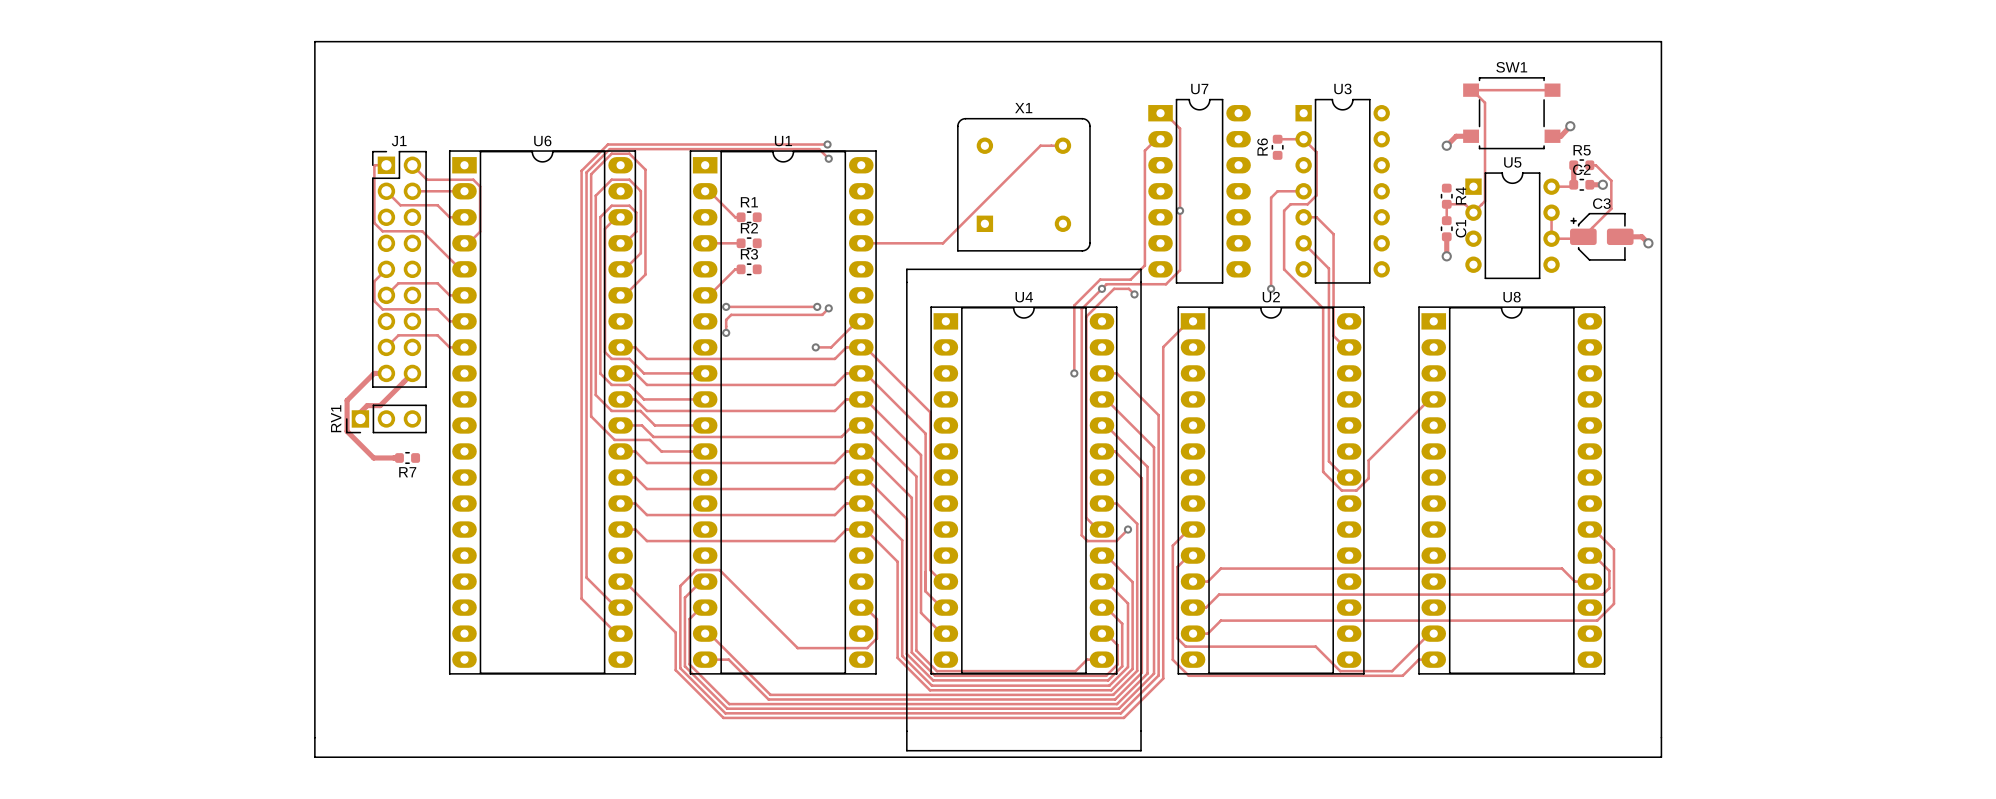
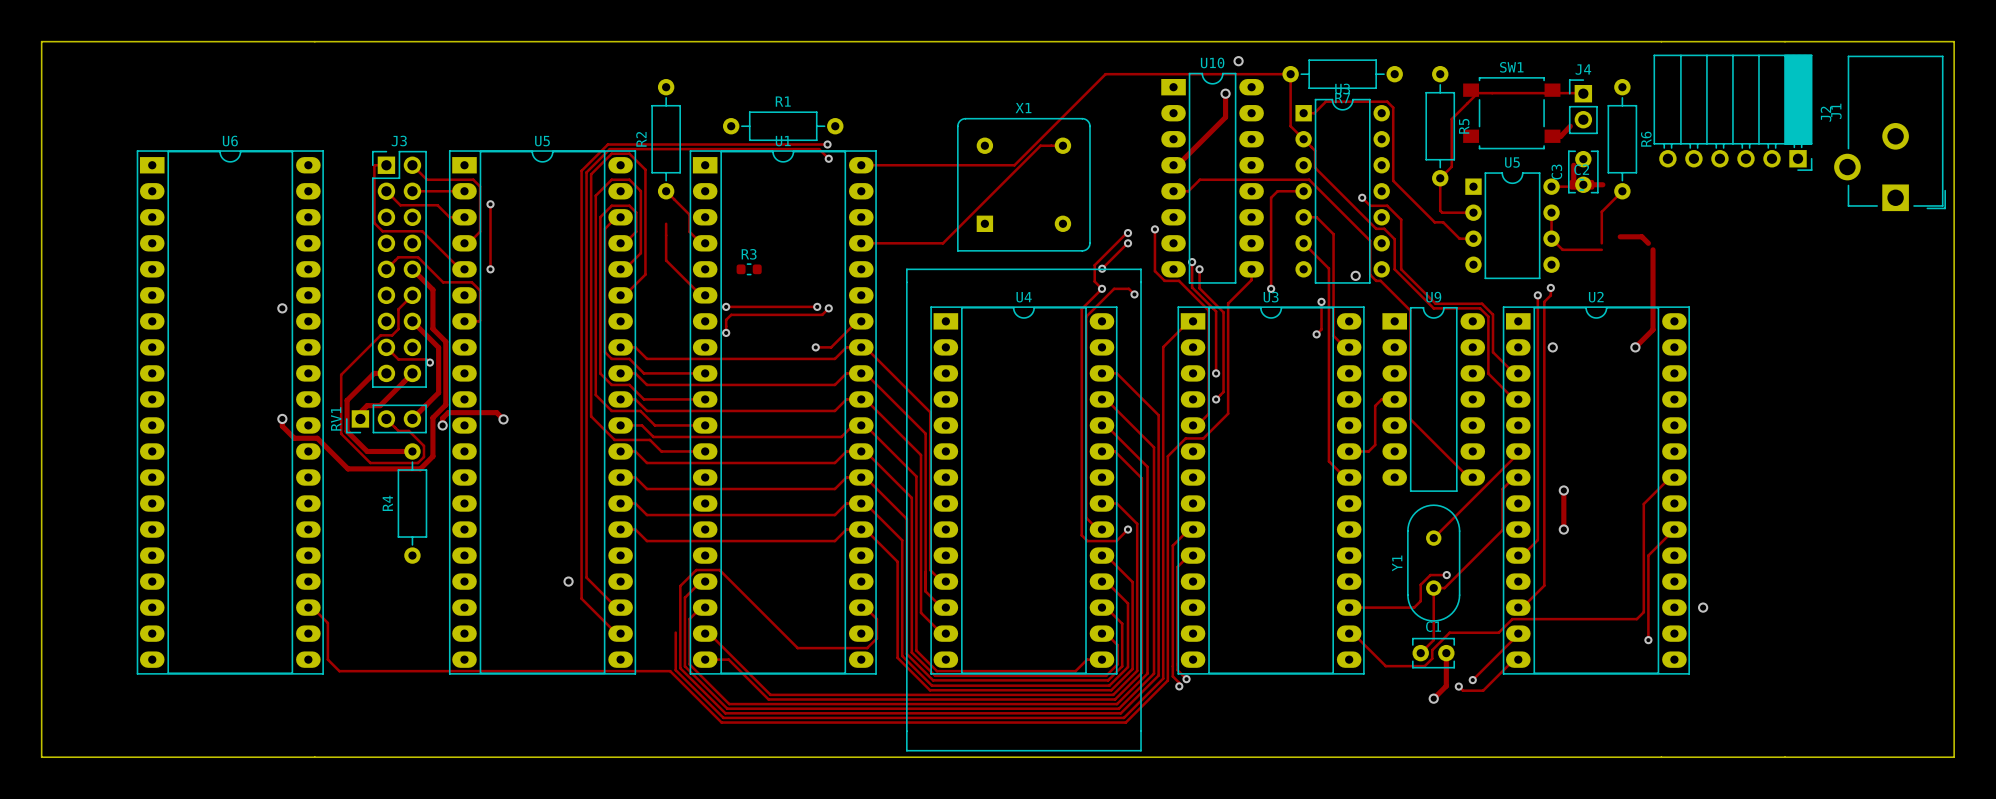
board edge: (314, 41) (314, 757) -> (314, 41) (41, 41) (41, 757) (314, 757)
board edge: (1661, 41) (1661, 757) -> (1661, 41) (1954, 41) (1954, 757) (1661, 757)
via: none -> (1238, 61)
track: (1471, 90) (1552, 90) -> none
track: (1472, 90) (1485, 102) (1485, 201) (1473, 212) (1465, 204) (1446, 204) (1446, 220) -> none
track: none -> (1225, 93) (1225, 117) (1177, 165) (1173, 165)
via: none -> (1225, 93)
track: none -> (1583, 93) (1477, 93) (1451, 119) (1451, 166) (1440, 178) (1440, 210) (1442, 212) (1473, 212)
J4: none -> (1583, 106)
J2: none -> (1732, 112)
track: (1160, 113) (1164, 113) (1180, 128) (1180, 270) (1166, 284) (1106, 284) (1101, 288) -> (1127, 233) (1094, 265) (1094, 281) (1101, 288)
track: none -> (1303, 113) (1314, 113) (1325, 101) (1387, 101) (1393, 107) (1393, 180) (1434, 222) (1443, 222) (1459, 238) (1473, 238)
via: (1570, 126) -> none
J1: none -> (1889, 133)
R6 footprint: [1271, 134, 1284, 160] -> [1607, 79, 1638, 200]
track: (1471, 136) (1456, 136) (1446, 145) -> none
track: (1160, 139) (1156, 139) (1144, 150) (1144, 265) (1130, 279) (1100, 279) (1074, 305) (1074, 373) -> none
track: (1277, 139) (1303, 139) -> (861, 165) (1014, 165) (1105, 74) (1290, 74) (1290, 126) (1303, 139)
J1 name: J1 (399, 141) -> J3 (399, 141)
U6 name: U6 (542, 141) -> U5 (542, 141)
via: (1446, 145) -> none
R6 name position: R6 (1262, 147) -> R6 (1646, 139)
track: (1315, 150) (1316, 195) (1307, 204) (1290, 204) (1284, 210) (1284, 269) (1323, 308) (1323, 471) (1341, 490) (1356, 490) (1368, 478) (1368, 460) (1429, 399) (1433, 399) -> (1315, 150) (1315, 167) (1376, 228) (1384, 228) (1394, 239) (1394, 269) (1433, 308) (1480, 308) (1488, 316) (1488, 373) (1514, 399) (1518, 399)
R5 name position: R5 (1582, 150) -> R5 (1464, 126)
R5 footprint: [1569, 159, 1595, 172] -> [1425, 65, 1455, 187]
track: (1589, 165) (1595, 165) (1611, 180) (1611, 208) (1581, 238) (1551, 238) -> (1601, 249) (1562, 249) (1551, 238)
U10: none -> (1212, 178)
R4 footprint: [1440, 183, 1453, 209] -> [397, 443, 428, 564]
via: (1602, 184) -> none
track: (705, 191) (709, 191) (735, 217) (741, 217) -> none
track: none -> (1173, 191) (1188, 191) (1199, 179) (1309, 179) (1370, 240) (1370, 274) (1376, 280) (1380, 280) (1410, 310) (1410, 419) (1468, 477) (1472, 477)
U7: (1199, 191) -> none
track: none -> (1622, 191) (1601, 211) (1601, 243)
R4 name position: R4 (1461, 195) -> R4 (387, 503)
track: none -> (1362, 197) (1370, 205) (1387, 205) (1401, 219) (1401, 269) (1435, 303) (1482, 303) (1493, 314) (1493, 352) (1514, 373) (1518, 373)
via: none -> (1362, 197)
C3 name position: C3 (1601, 203) -> C3 (1556, 172)
track: none -> (490, 204) (490, 269)
via: none -> (490, 204)
via: (1180, 210) -> none
R1 footprint: [736, 211, 762, 224] -> [723, 111, 844, 141]
C3 footprint: [1570, 213, 1634, 261] -> [1568, 150, 1599, 194]
C1 footprint: [1440, 216, 1453, 242] -> [1412, 637, 1455, 669]
R2 name position: R2 (749, 228) -> R2 (641, 139)
C1 name position: C1 (1461, 228) -> C1 (1433, 626)
track: none -> (1154, 229) (1154, 271) (1164, 280) (1179, 280) (1208, 310) (1208, 413) (1197, 425) (1193, 425)
via: none -> (1154, 229)
via: none -> (1127, 233)
track: (1446, 236) (1446, 256) -> none
R2 footprint: [736, 237, 762, 250] -> [651, 79, 681, 200]
track: (705, 243) (741, 243) -> (705, 243) (701, 243) (689, 231) (689, 214) (666, 191)
track: none -> (1128, 243) (1102, 268)
via: none -> (1128, 243)
via: (1648, 243) -> none
track: none -> (1653, 249) (1653, 329) (1635, 347)
via: (1446, 256) -> none
track: none -> (1192, 262) (1192, 287) (1216, 311) (1216, 373)
via: none -> (1192, 262)
via: none -> (1102, 268)
track: (386, 269) (374, 281) (374, 301) (382, 309) (437, 309) (449, 321) (464, 321) -> (386, 269) (398, 257) (418, 257) (443, 282) (471, 282) (480, 290) (480, 320) (464, 321)
track: none -> (412, 269) (432, 289) (432, 328) (445, 341) (445, 404) (432, 417) (432, 456) (420, 468) (347, 468) (317, 438) (294, 438) (282, 426) (282, 418)
via: none -> (490, 269)
track: (741, 269) (735, 269) (709, 295) (705, 295) -> (666, 223) (666, 260) (701, 295) (705, 295)
track: none -> (1199, 269) (1199, 288) (1223, 312) (1223, 392) (1216, 399)
via: none -> (1199, 269)
track: none -> (1251, 269) (1251, 280) (1228, 303) (1228, 413) (1203, 438) (1185, 438) (1167, 456) (1167, 680) (1125, 722) (721, 722) (670, 671) (339, 671) (327, 659) (327, 623) (312, 607) (308, 607)
via: none -> (1355, 275)
track: none -> (1550, 287) (1550, 295) (1544, 301) (1544, 585) (1522, 607) (1518, 607)
via: none -> (1550, 287)
track: (386, 295) (398, 283) (437, 283) (449, 295) (464, 295) -> none
track: none -> (412, 295) (398, 309) (398, 329) (392, 335) (380, 335) (341, 374) (341, 433) (370, 463) (417, 463) (423, 457) (423, 445) (409, 430) (398, 430) (386, 418)
track: none -> (1537, 295) (1537, 540) (1522, 555) (1518, 555)
via: none -> (1537, 295)
U2 name: U2 (1271, 297) -> U3 (1271, 297)
track: none -> (1321, 301) (1321, 329) (1316, 334)
via: none -> (1321, 301)
via: none -> (282, 308)
track: none -> (412, 321) (438, 347) (438, 392) (412, 418)
via: none -> (1316, 334)
track: (386, 347) (398, 335) (437, 335) (449, 347) (464, 347) -> (386, 347) (398, 359) (426, 359) (429, 362)
via: none -> (1552, 347)
via: none -> (1635, 347)
via: none -> (429, 362)
via: (1074, 373) -> none
via: none -> (1216, 373)
via: none -> (1216, 399)
track: none -> (1394, 399) (1381, 399) (1375, 405) (1375, 444) (1368, 451) (1349, 451)
U9: none -> (1433, 399)
U6: none -> (230, 412)
via: none -> (282, 418)
track: none -> (503, 419) (496, 412) (448, 412) (442, 418) (442, 425)
via: none -> (503, 419)
via: none -> (442, 425)
track: (367, 451) (373, 457) (399, 457) -> (367, 451) (412, 451)
track: none -> (1518, 451) (1433, 538)
R7 footprint: [394, 452, 421, 464] -> [1282, 59, 1403, 89]
track: none -> (1518, 477) (1514, 477) (1502, 489) (1502, 530) (1444, 588) (1433, 588) (1433, 640) (1420, 653)
track: none -> (1674, 477) (1670, 477) (1643, 504) (1643, 612) (1636, 619) (1512, 619) (1498, 632) (1449, 632) (1432, 650) (1432, 658) (1424, 666) (1385, 666) (1353, 633) (1349, 633)
U8: (1511, 490) -> none
track: none -> (1563, 490) (1563, 529)
via: none -> (1563, 490)
U2: none -> (1596, 490)
via: none -> (1563, 529)
track: (1589, 529) (1593, 529) (1613, 549) (1613, 603) (1597, 620) (1220, 620) (1207, 633) (1193, 633) -> none
track: none -> (1674, 529) (1648, 555) (1648, 640)
track: (1589, 555) (1593, 555) (1609, 570) (1609, 588) (1602, 594) (1219, 594) (1206, 607) (1199, 607) -> none
Y1: none -> (1433, 563)
track: none -> (1446, 575) (1430, 575) (1420, 584) (1420, 601) (1414, 607) (1349, 607)
via: none -> (1446, 575)
via: none -> (568, 581)
track: (620, 581) (624, 581) (675, 632) -> none
track: (1193, 581) (1207, 581) (1220, 568) (1561, 568) (1575, 581) (1589, 581) -> none
via: none -> (1703, 607)
track: (1433, 633) (1429, 633) (1392, 671) (1340, 671) (1315, 646) (1185, 646) (1177, 638) -> (1186, 679) (1177, 670) (1177, 638)
track: none -> (1514, 633) (1518, 634) (1472, 680)
via: none -> (1648, 640)
track: none -> (1446, 653) (1446, 686) (1433, 698)
track: (1433, 659) (1418, 659) (1402, 675) (1188, 675) (1172, 659) -> (1179, 686) (1179, 682) (1172, 676) (1172, 659)
track: none -> (1518, 659) (1514, 659) (1483, 690) (1462, 690) (1458, 686)
via: none -> (1186, 679)
via: none -> (1472, 680)
via: none -> (1179, 686)
via: none -> (1458, 686)
via: none -> (1433, 698)

